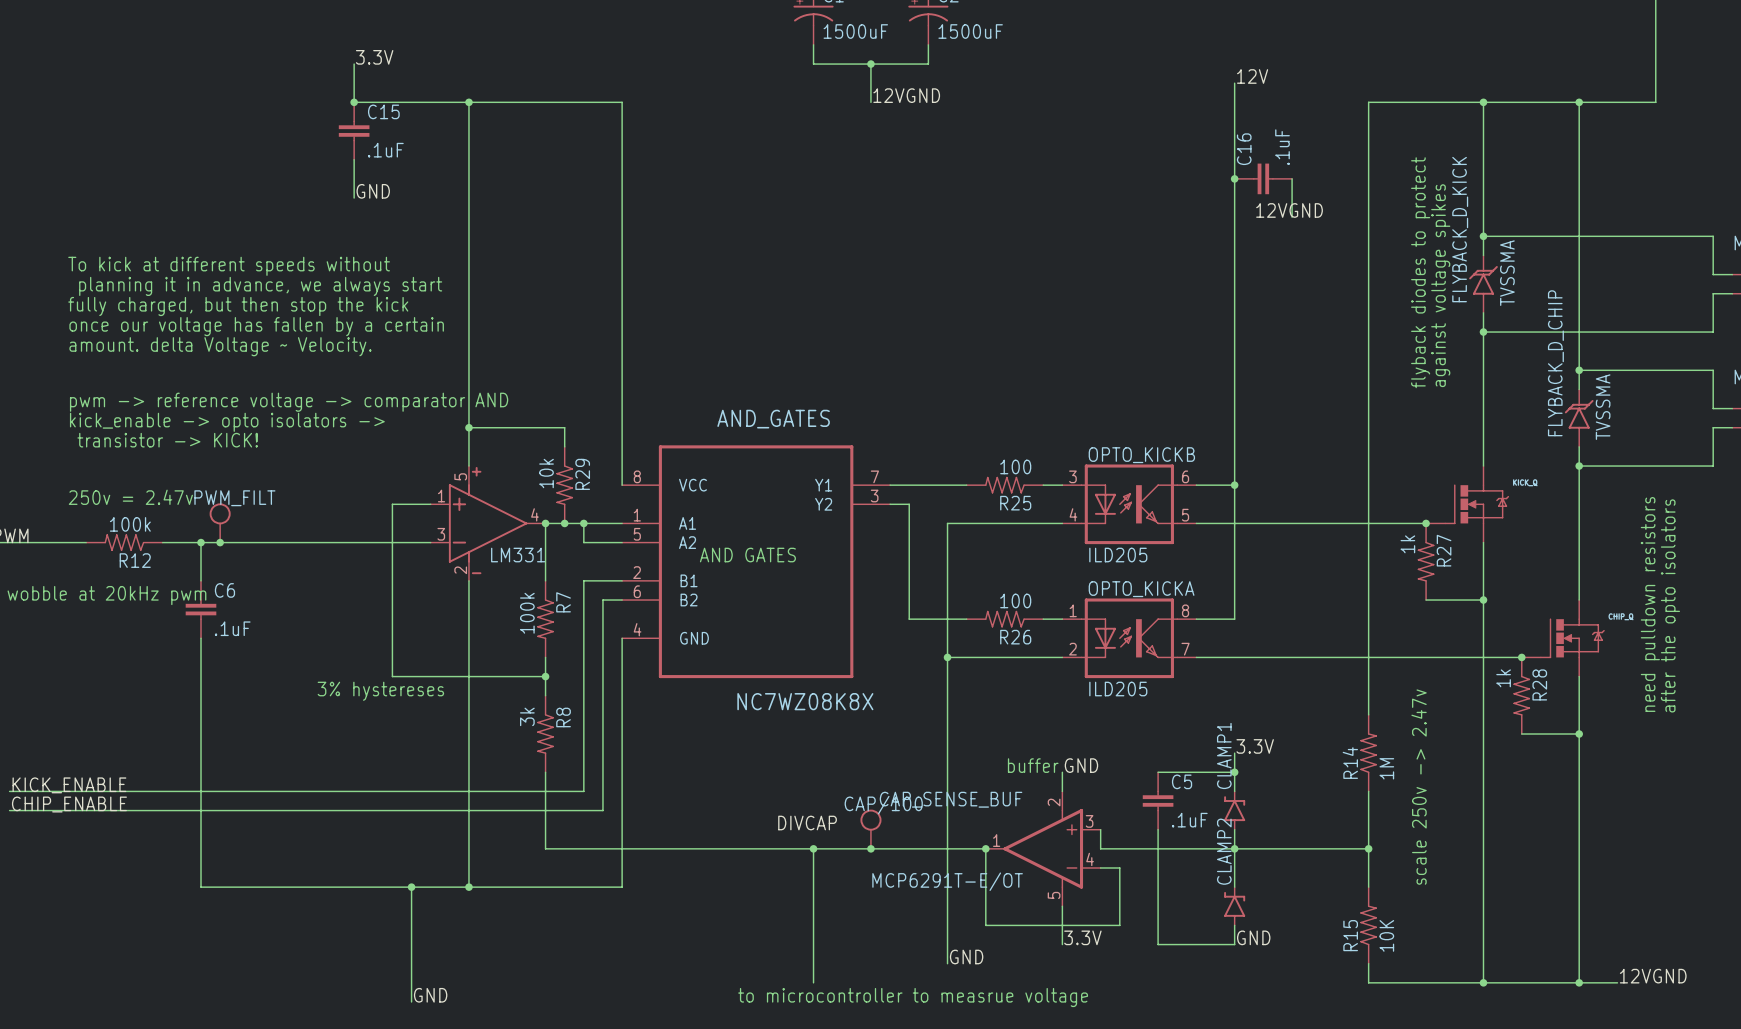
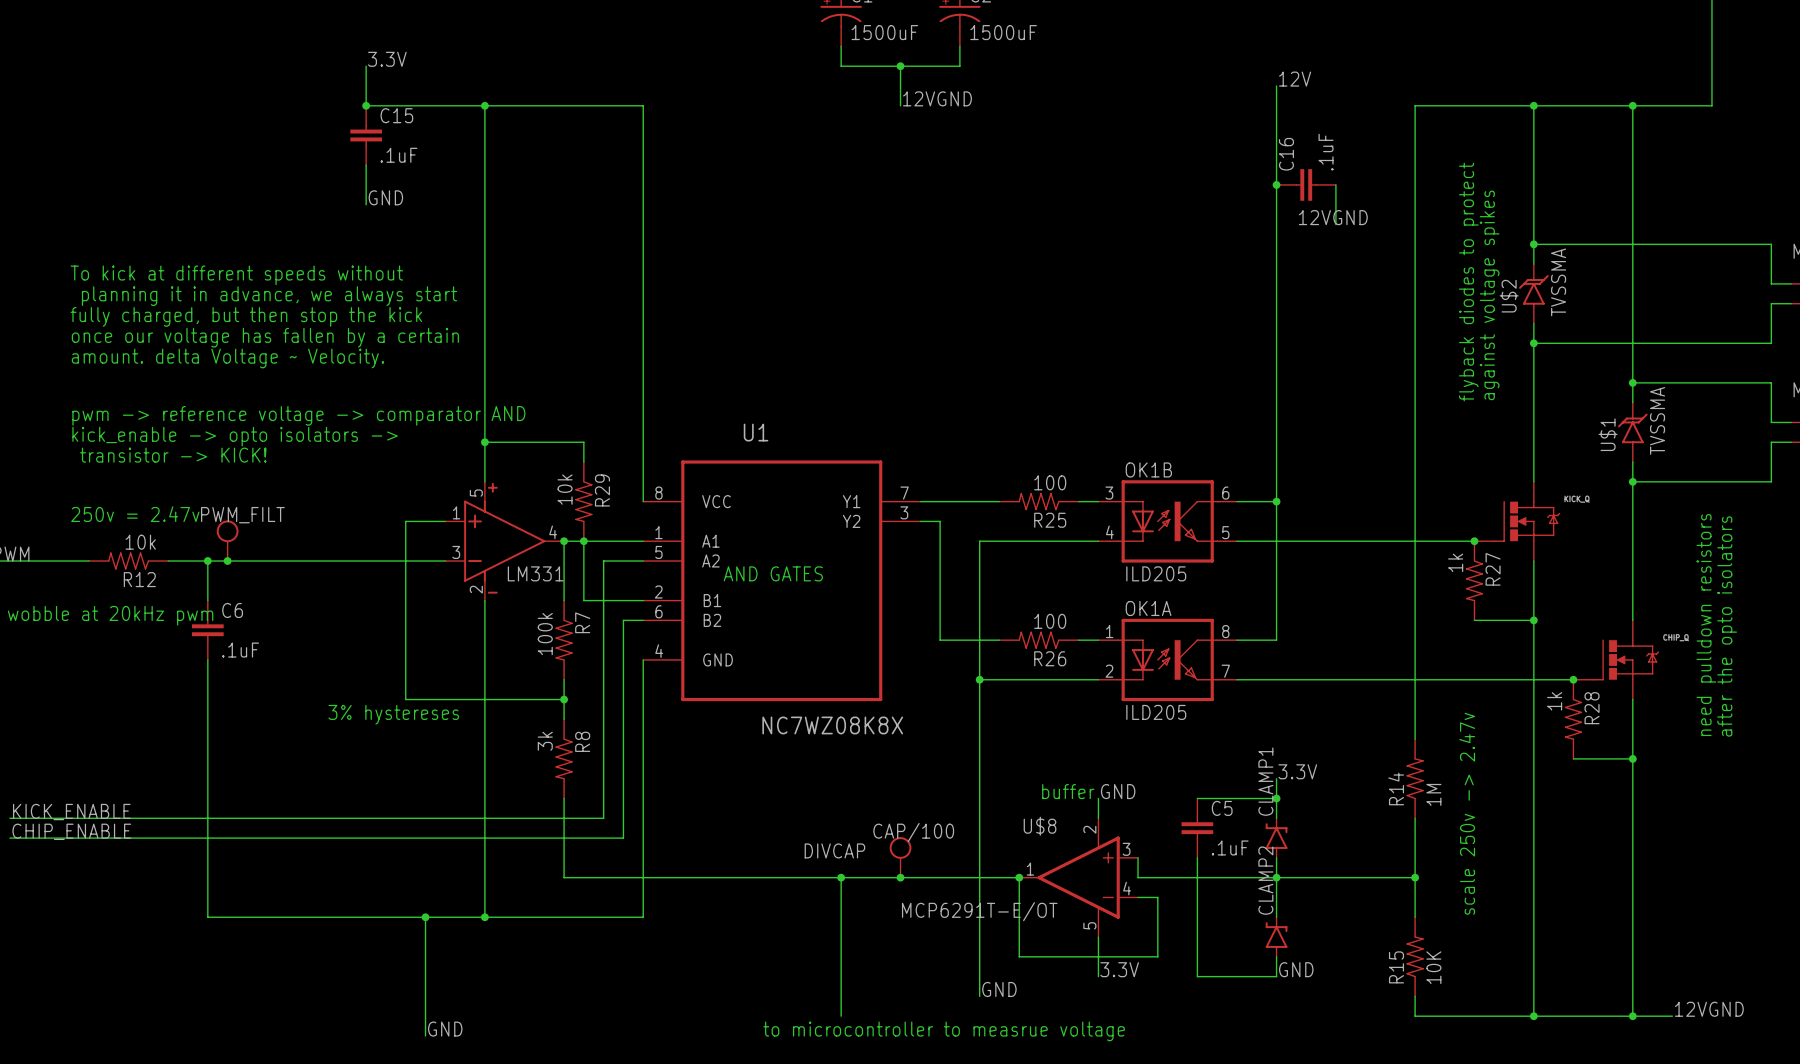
FLYBACK_D_KICK name: FLYBACK_D_KICK (1460, 229) -> U$2 (1509, 296)
FLYBACK_D_CHIP name: FLYBACK_D_CHIP (1555, 363) -> U$1 (1608, 434)
AND_GATES name: AND_GATES (773, 419) -> U1 (756, 432)
OPTO_KICKB name: OPTO_KICKB (1141, 455) -> OK1B (1148, 469)
wire: (583, 523) (583, 542) -> (583, 541) (583, 600) (603, 600) (603, 561)
junction: (583, 523) -> none
R12 value: 100k (130, 524) -> 10k (140, 542)
OPTO_KICKA name: OPTO_KICKA (1141, 589) -> OK1A (1148, 608)
CAP_SENSE_BUF name: CAP_SENSE_BUF (951, 799) -> U$8 (1040, 826)

